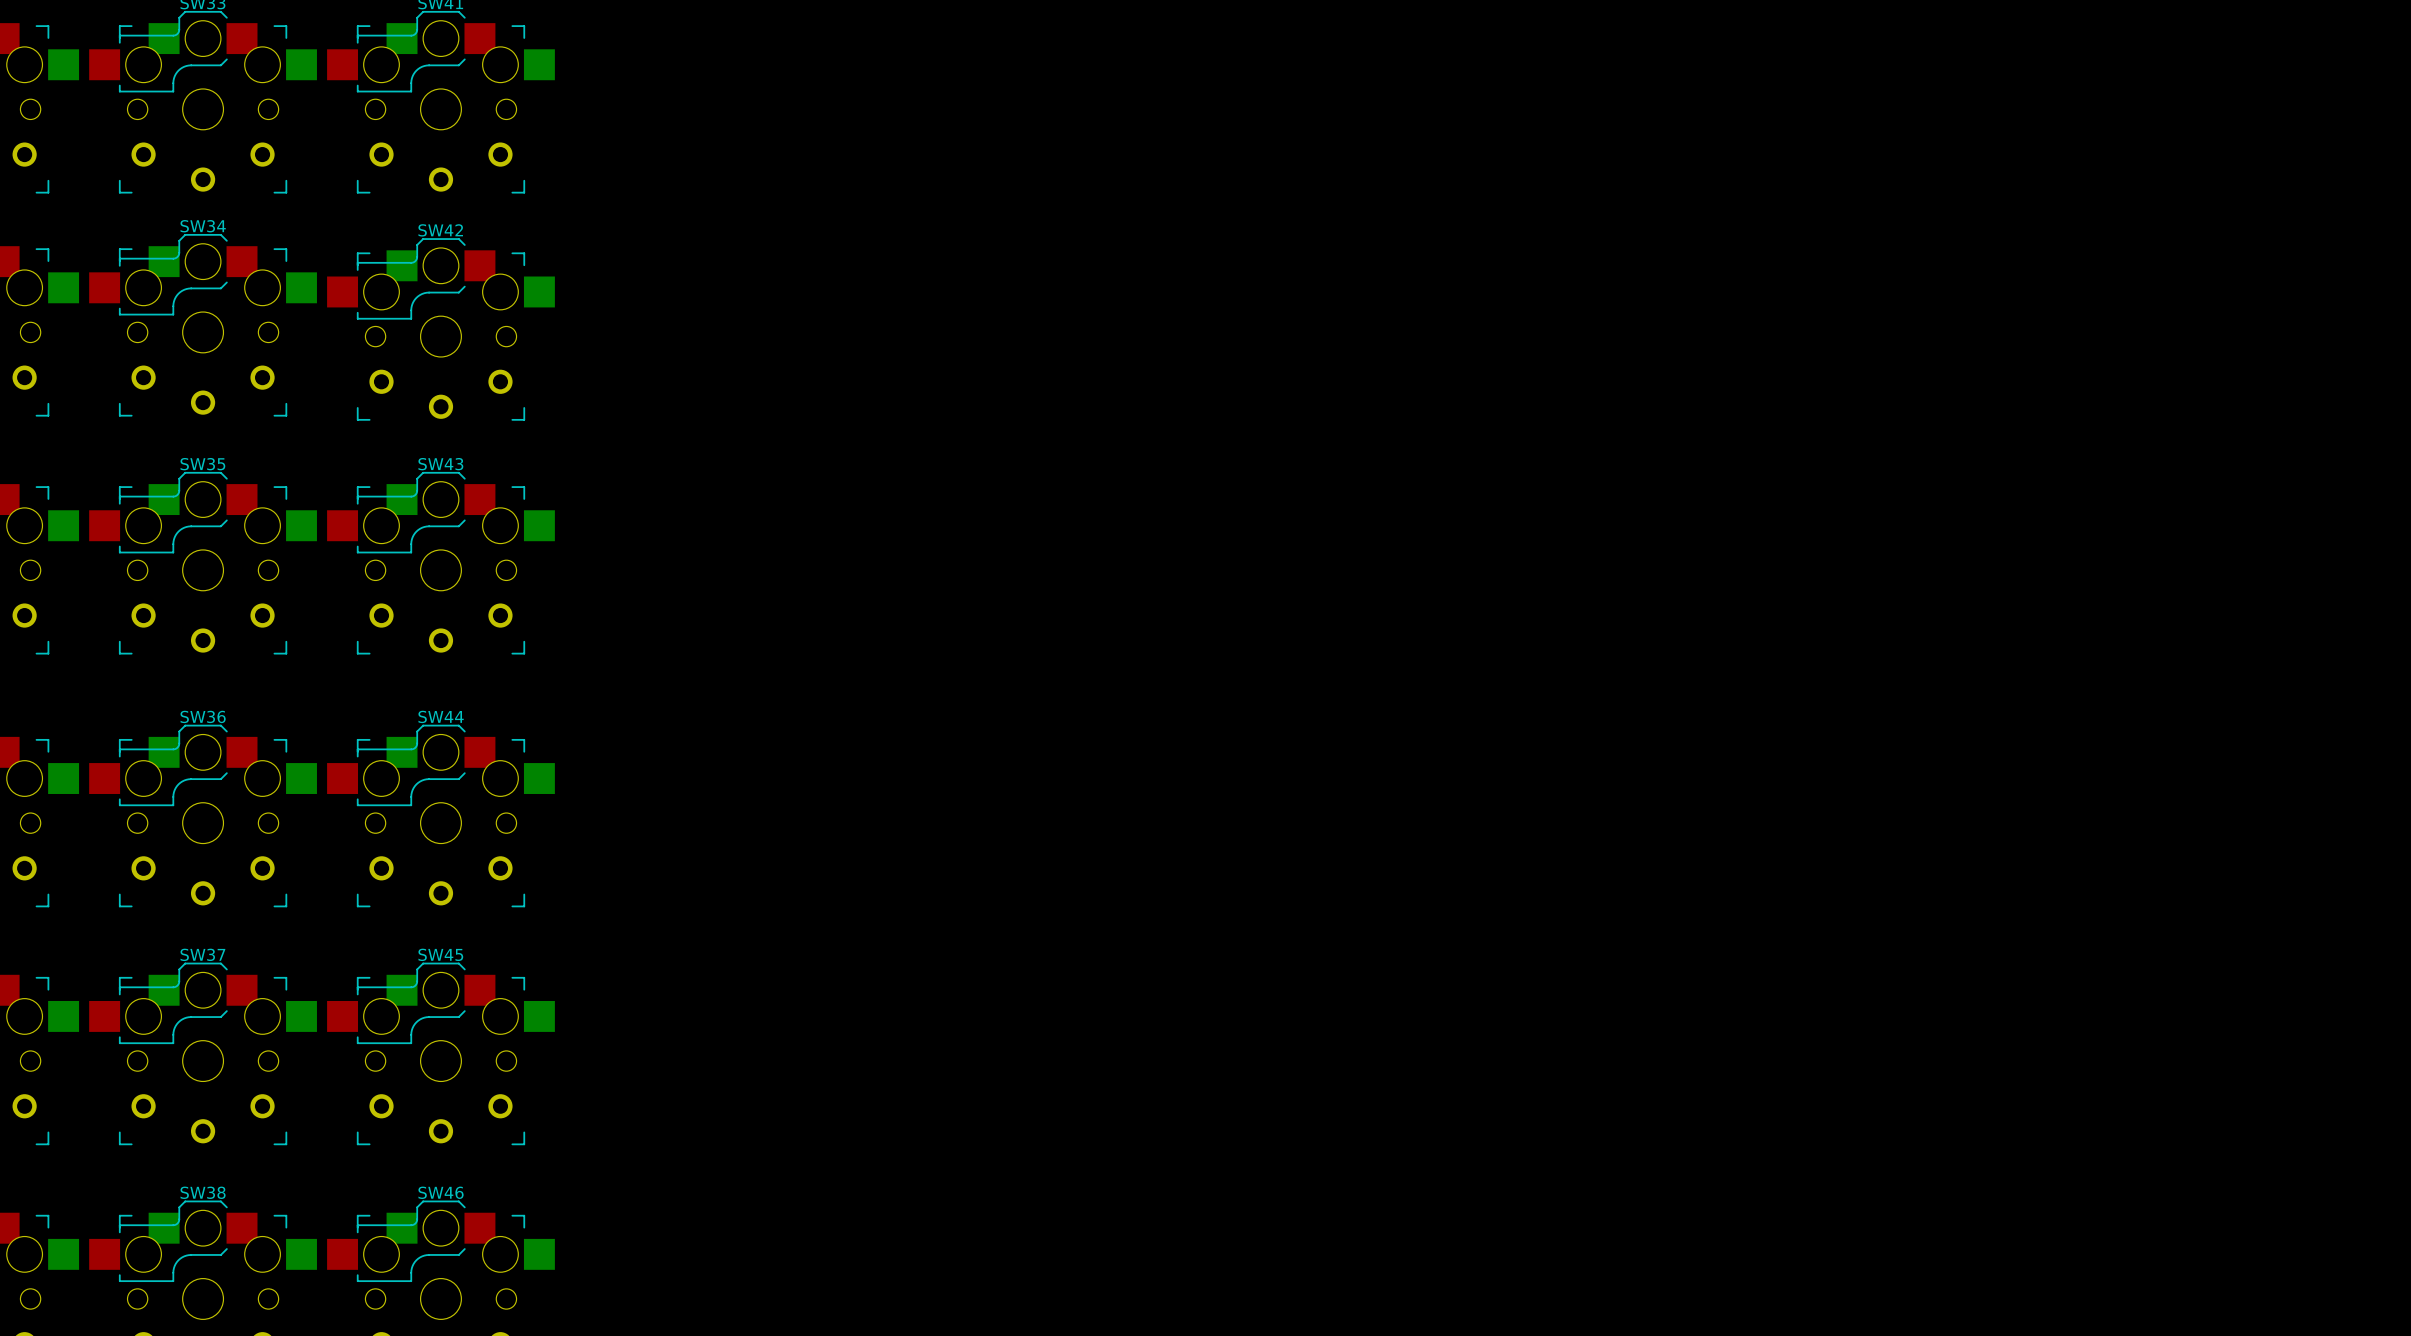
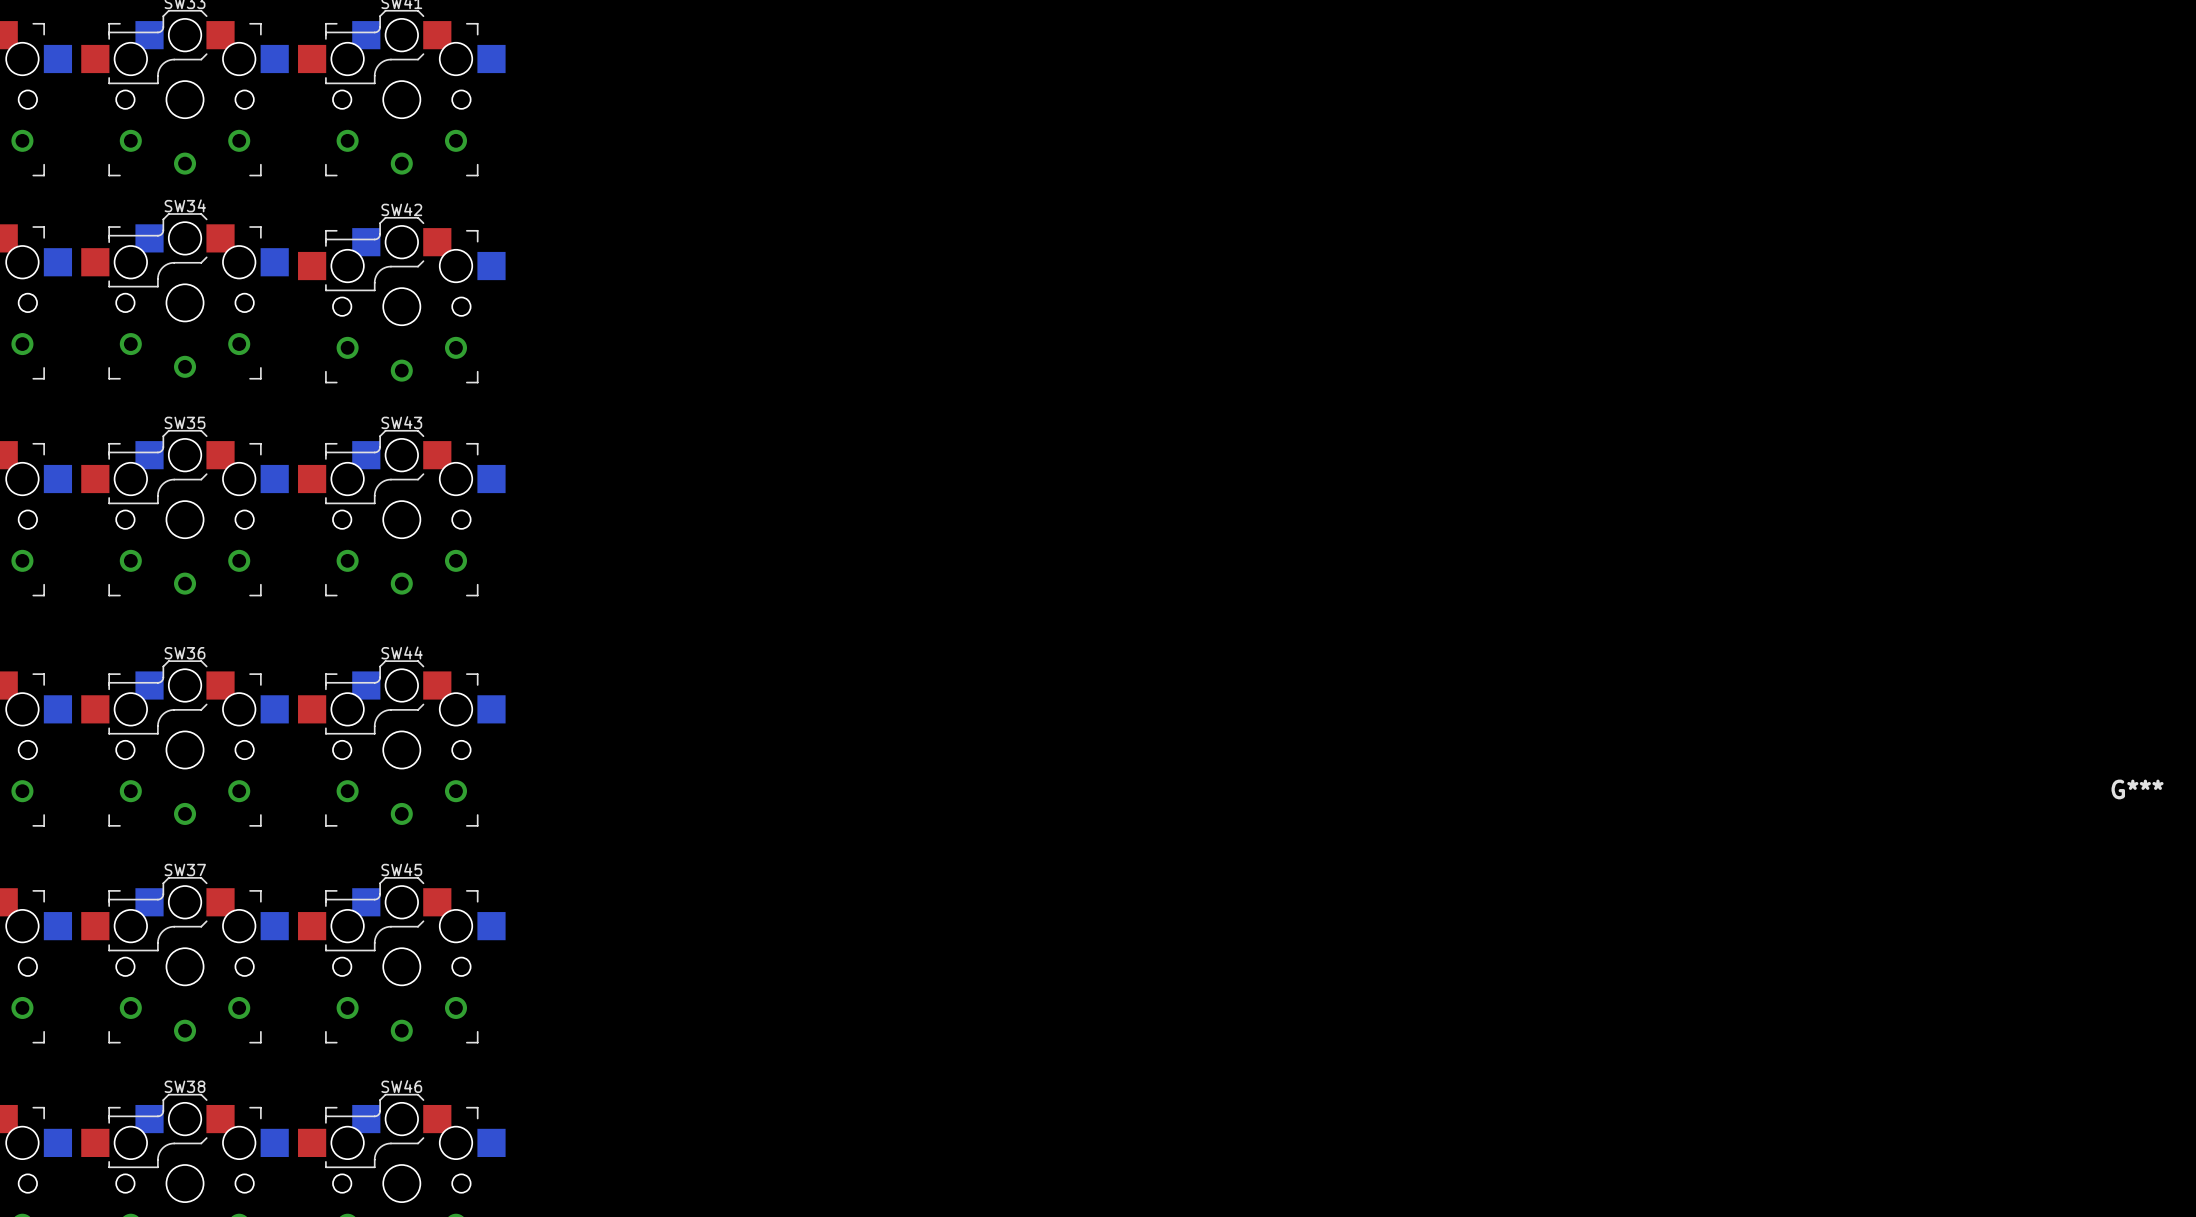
G***: none -> (2137, 789)

